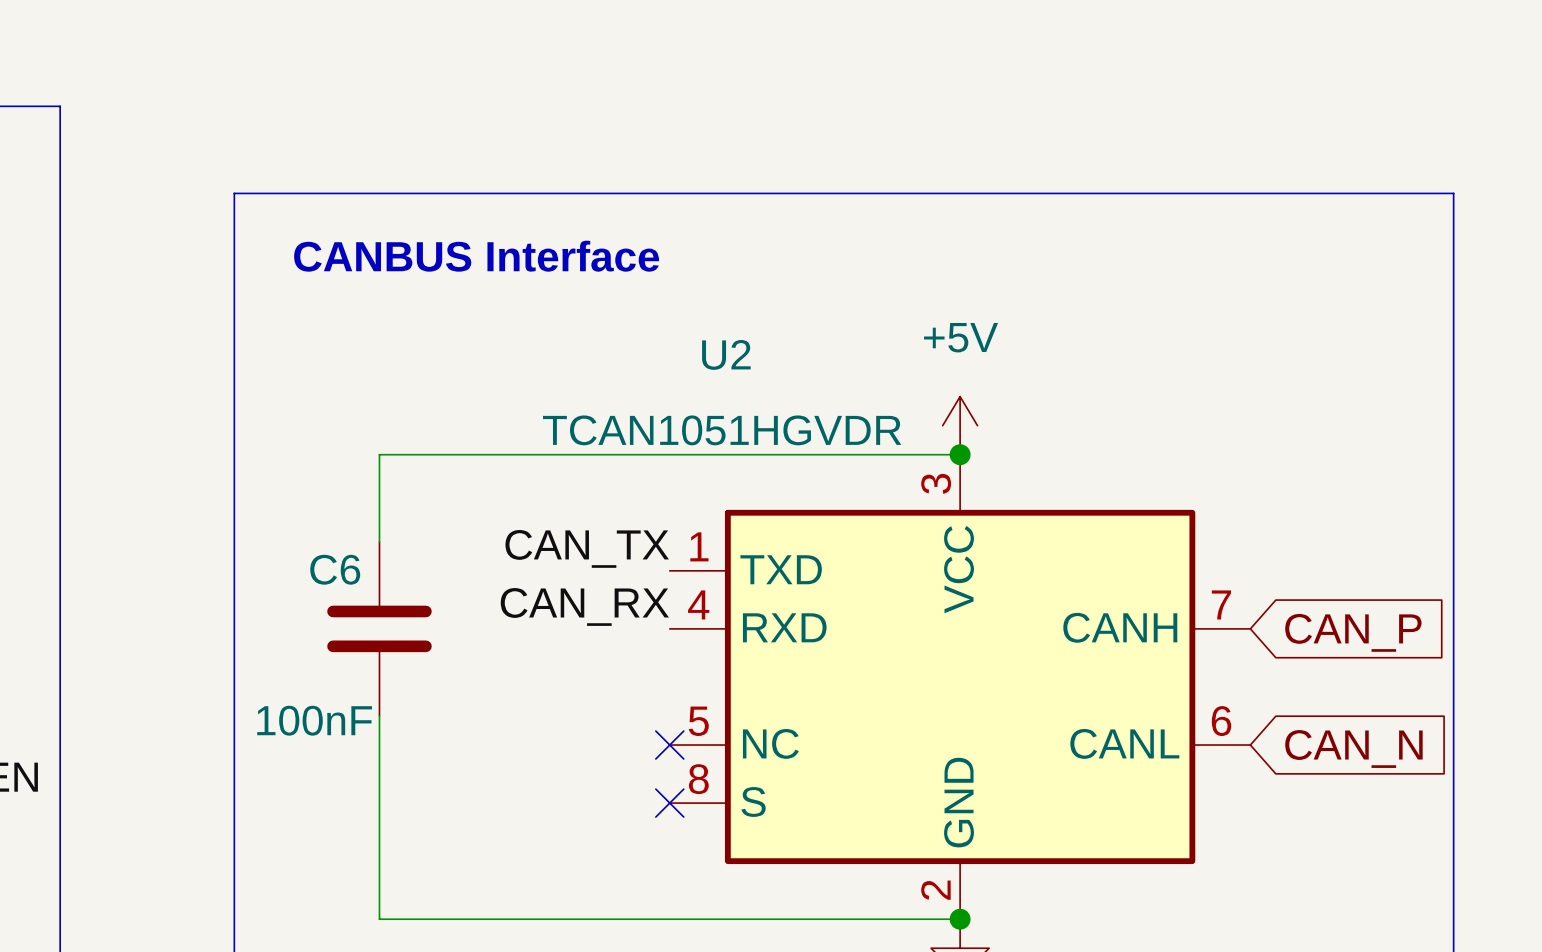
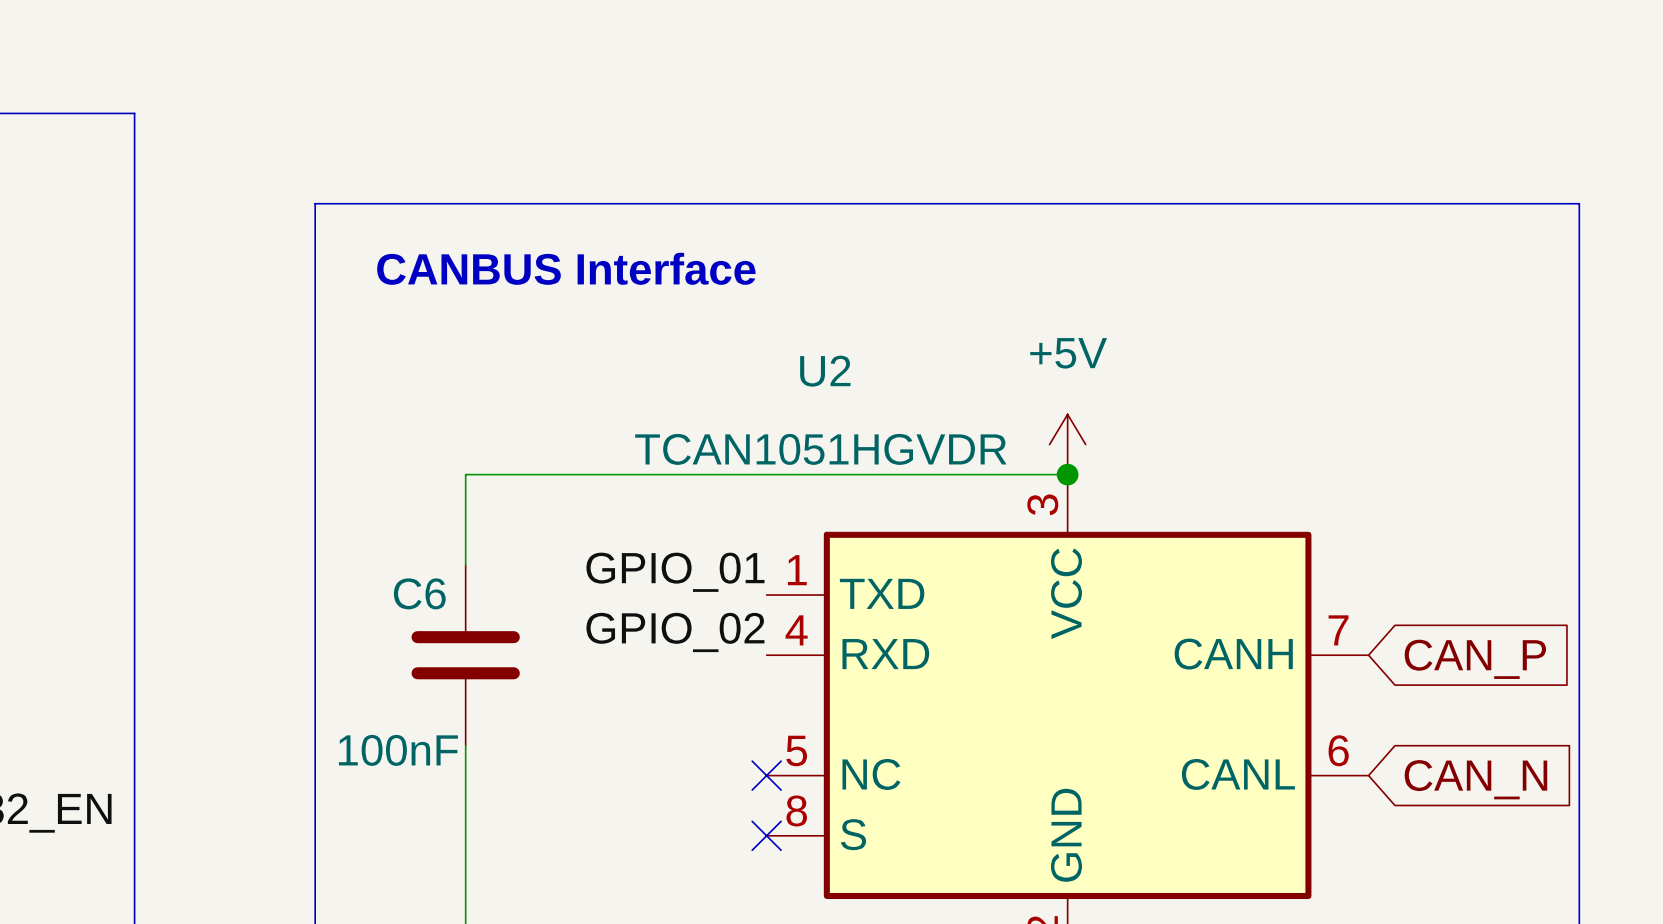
label: CAN_TX (587, 548) -> GPIO_01 (675, 572)
label: CAN_RX (584, 606) -> GPIO_02 (675, 632)

